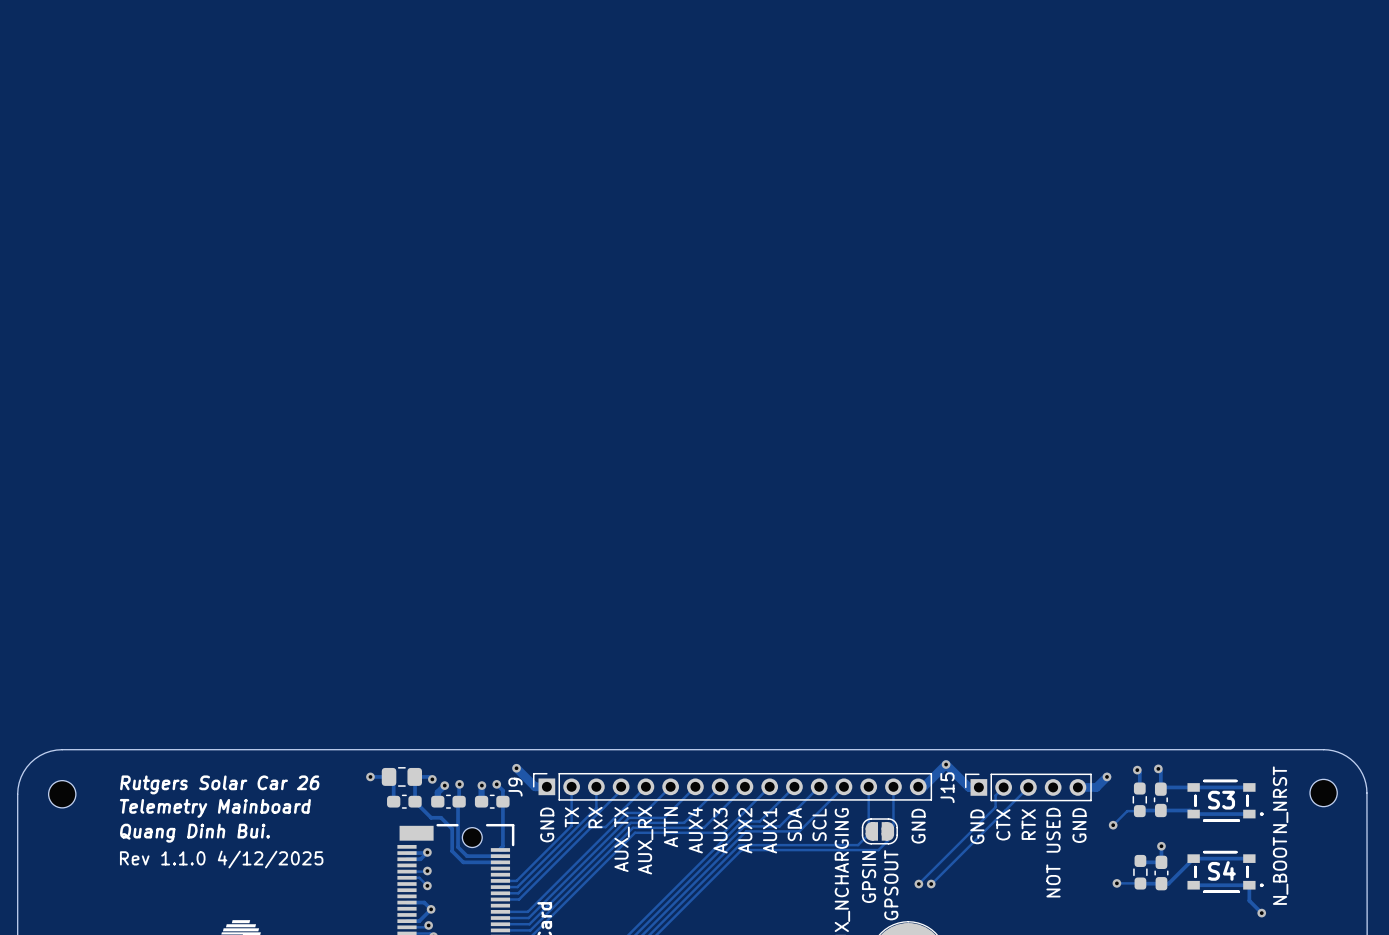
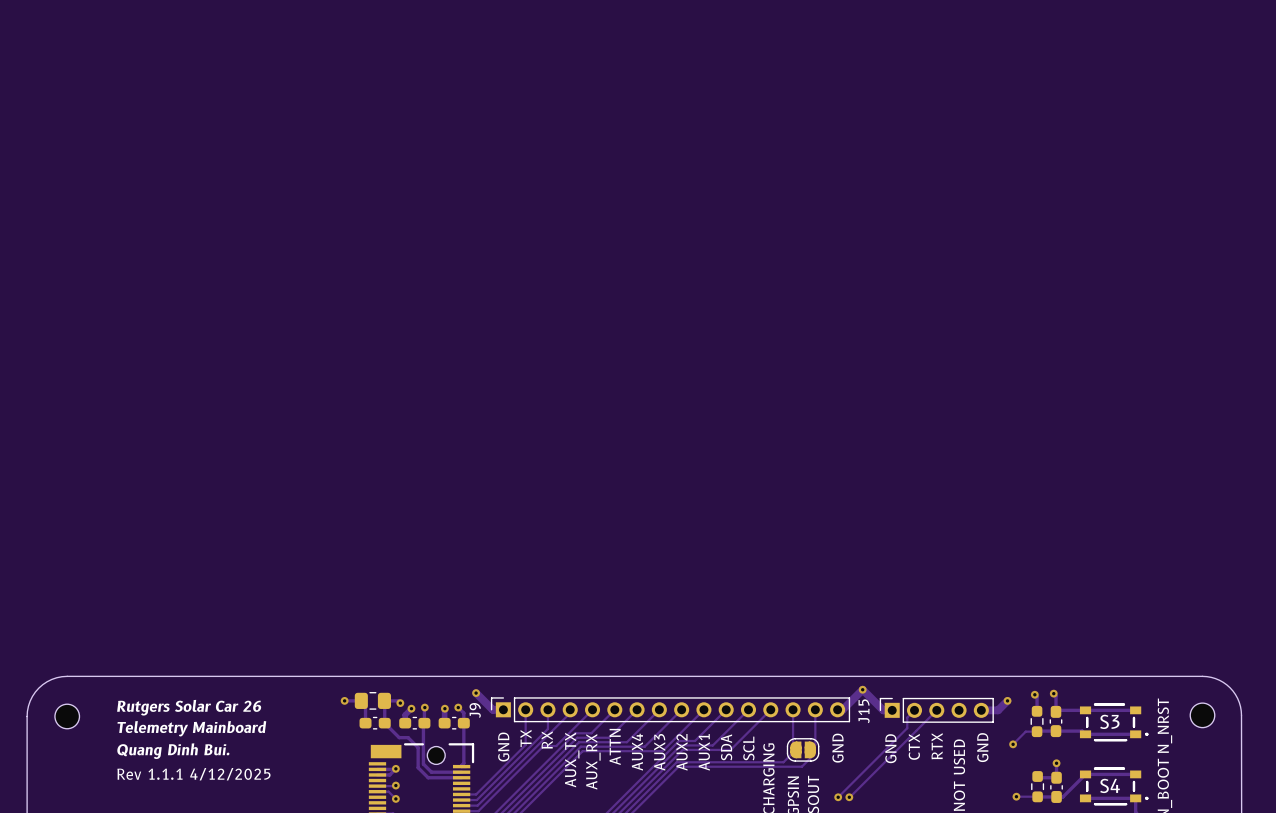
text: Rev 1.1.0 4/12/2025 (221, 859) -> Rev 1.1.1 4/12/2025 (193, 774)

